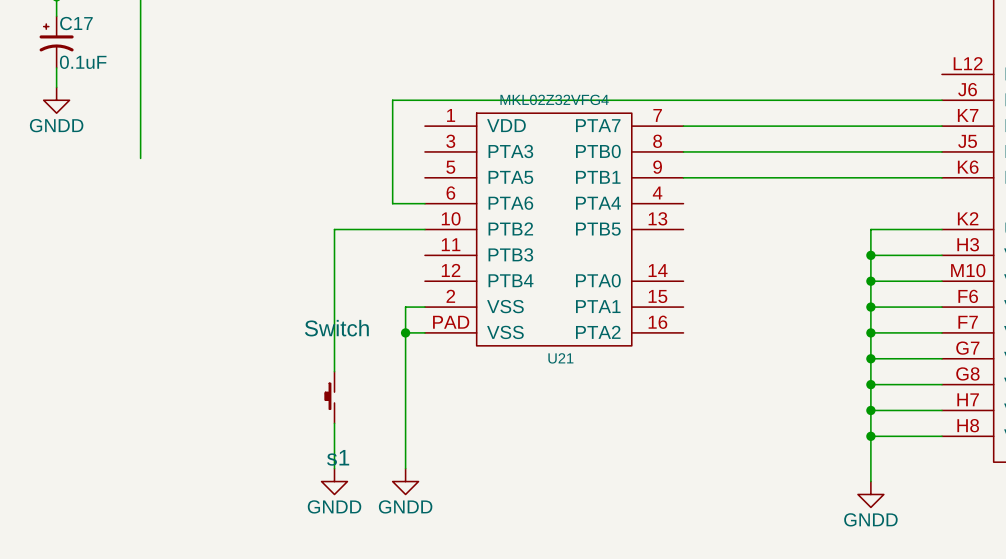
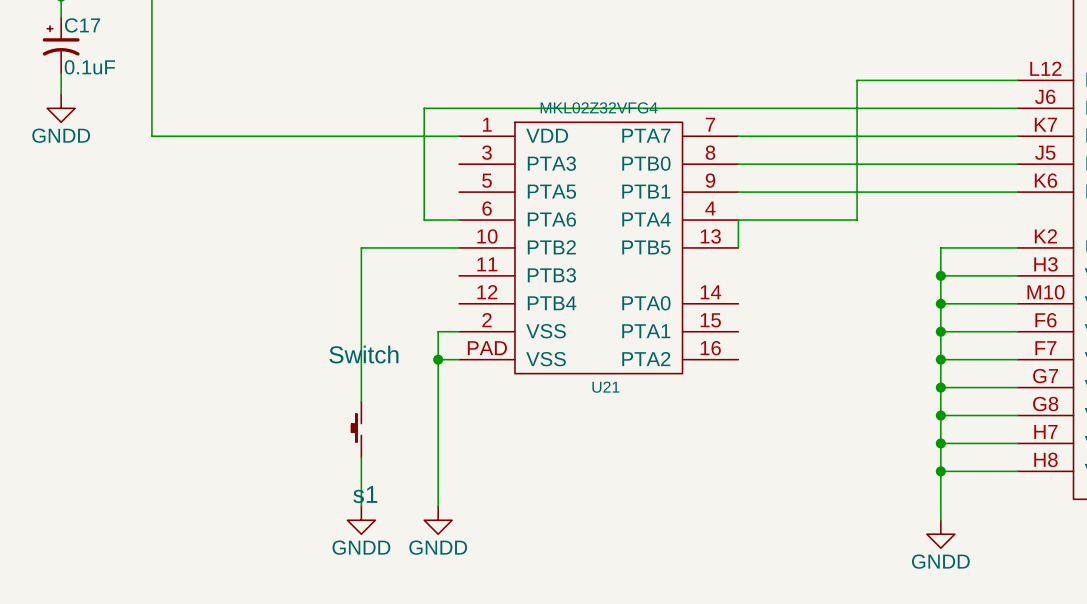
wire: none -> (1017, 80) (857, 80) (857, 220) (738, 220) (738, 247)
wire: (140, 126) (140, 158) -> (151, 136) (459, 136)

